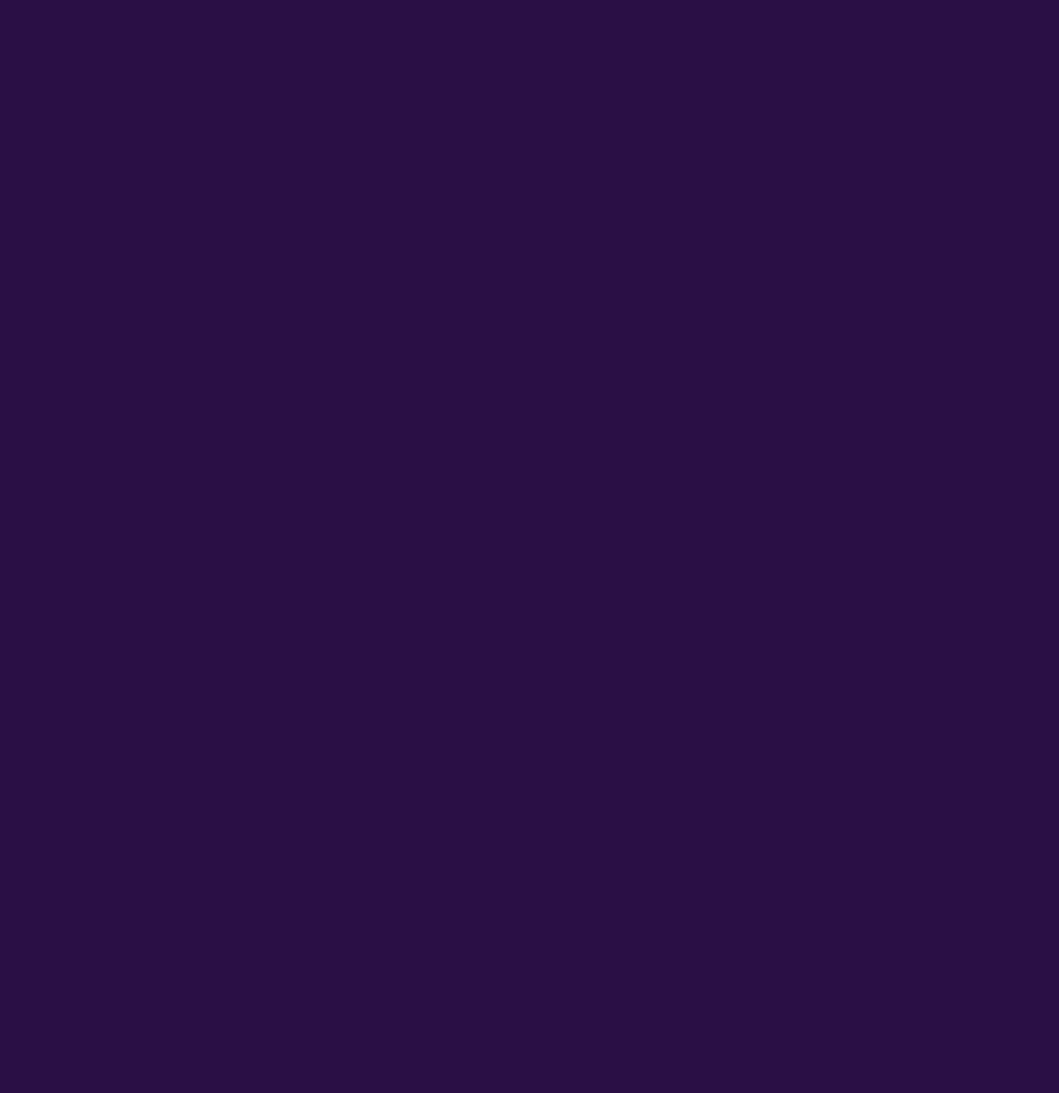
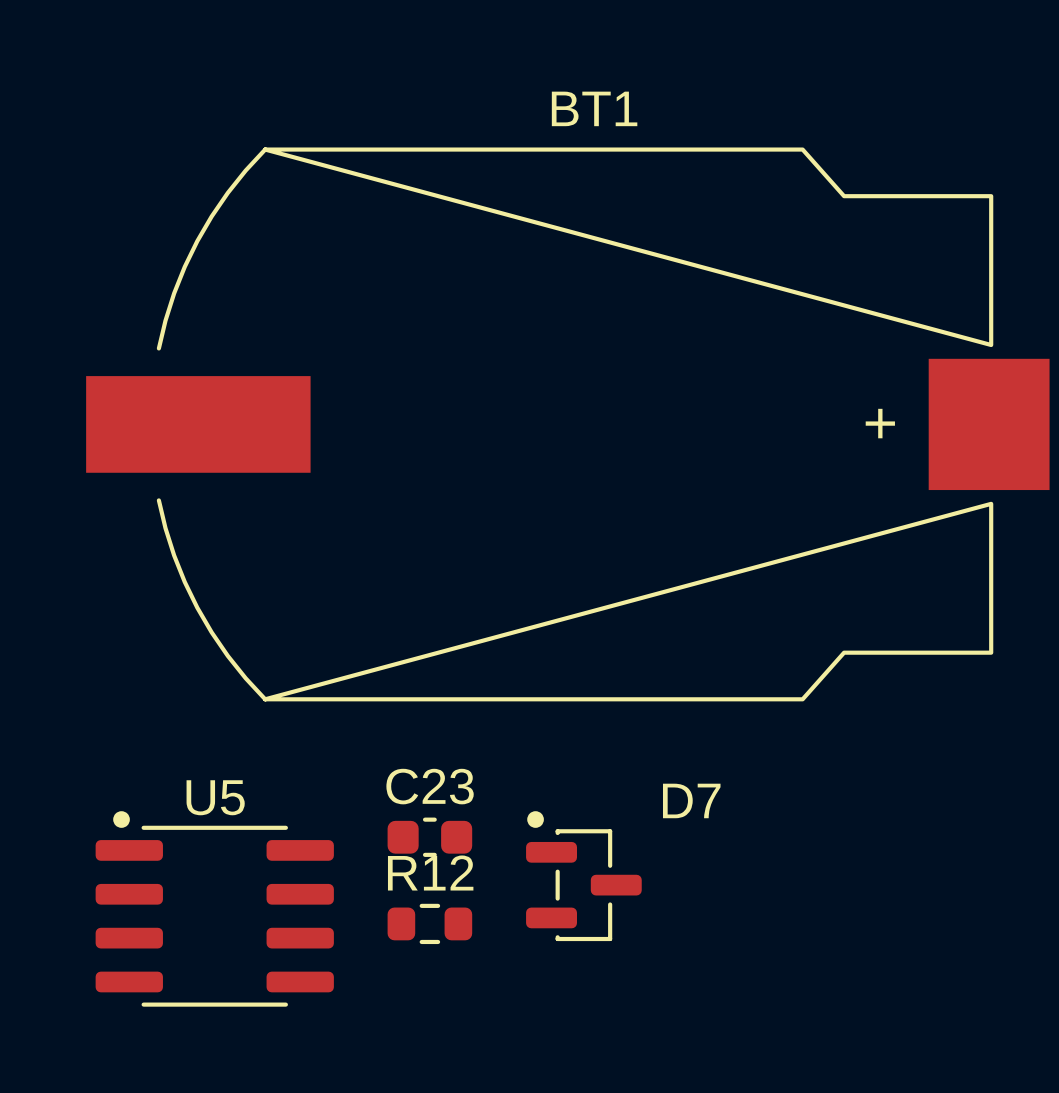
BT1: none -> (567, 424)
C23: none -> (429, 837)
D7: none -> (583, 876)
U5: none -> (214, 908)
R12: none -> (429, 923)

